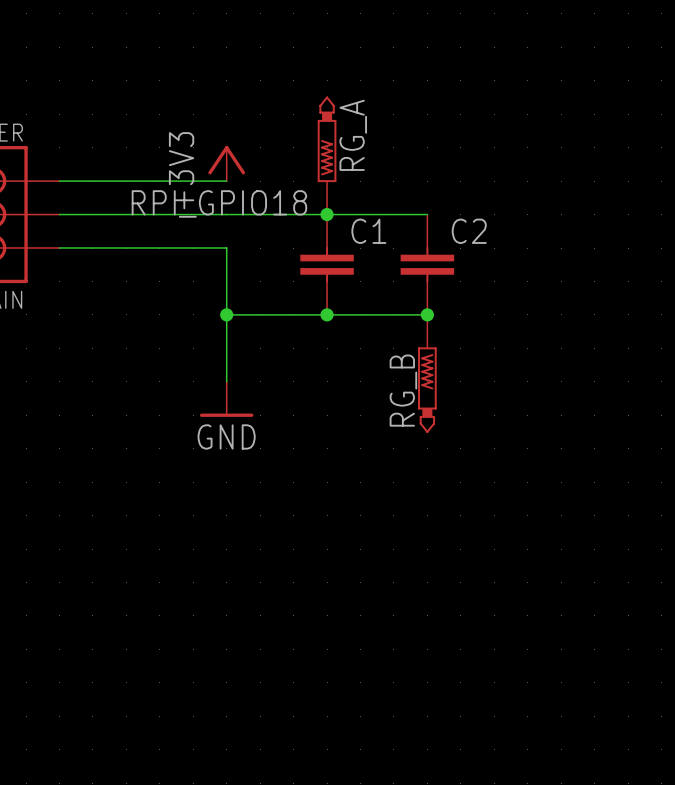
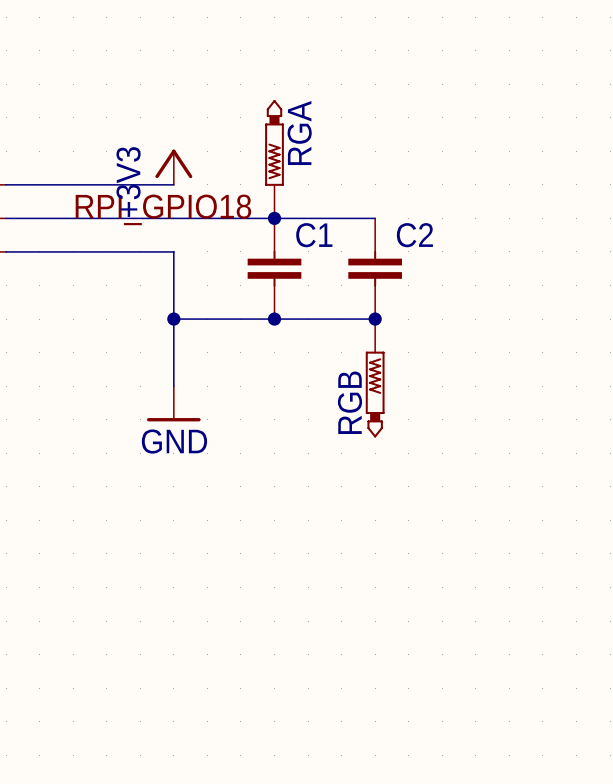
RG_A name: RG_A (353, 135) -> RGA (299, 133)
RG_B name: RG_B (403, 390) -> RGB (349, 402)

